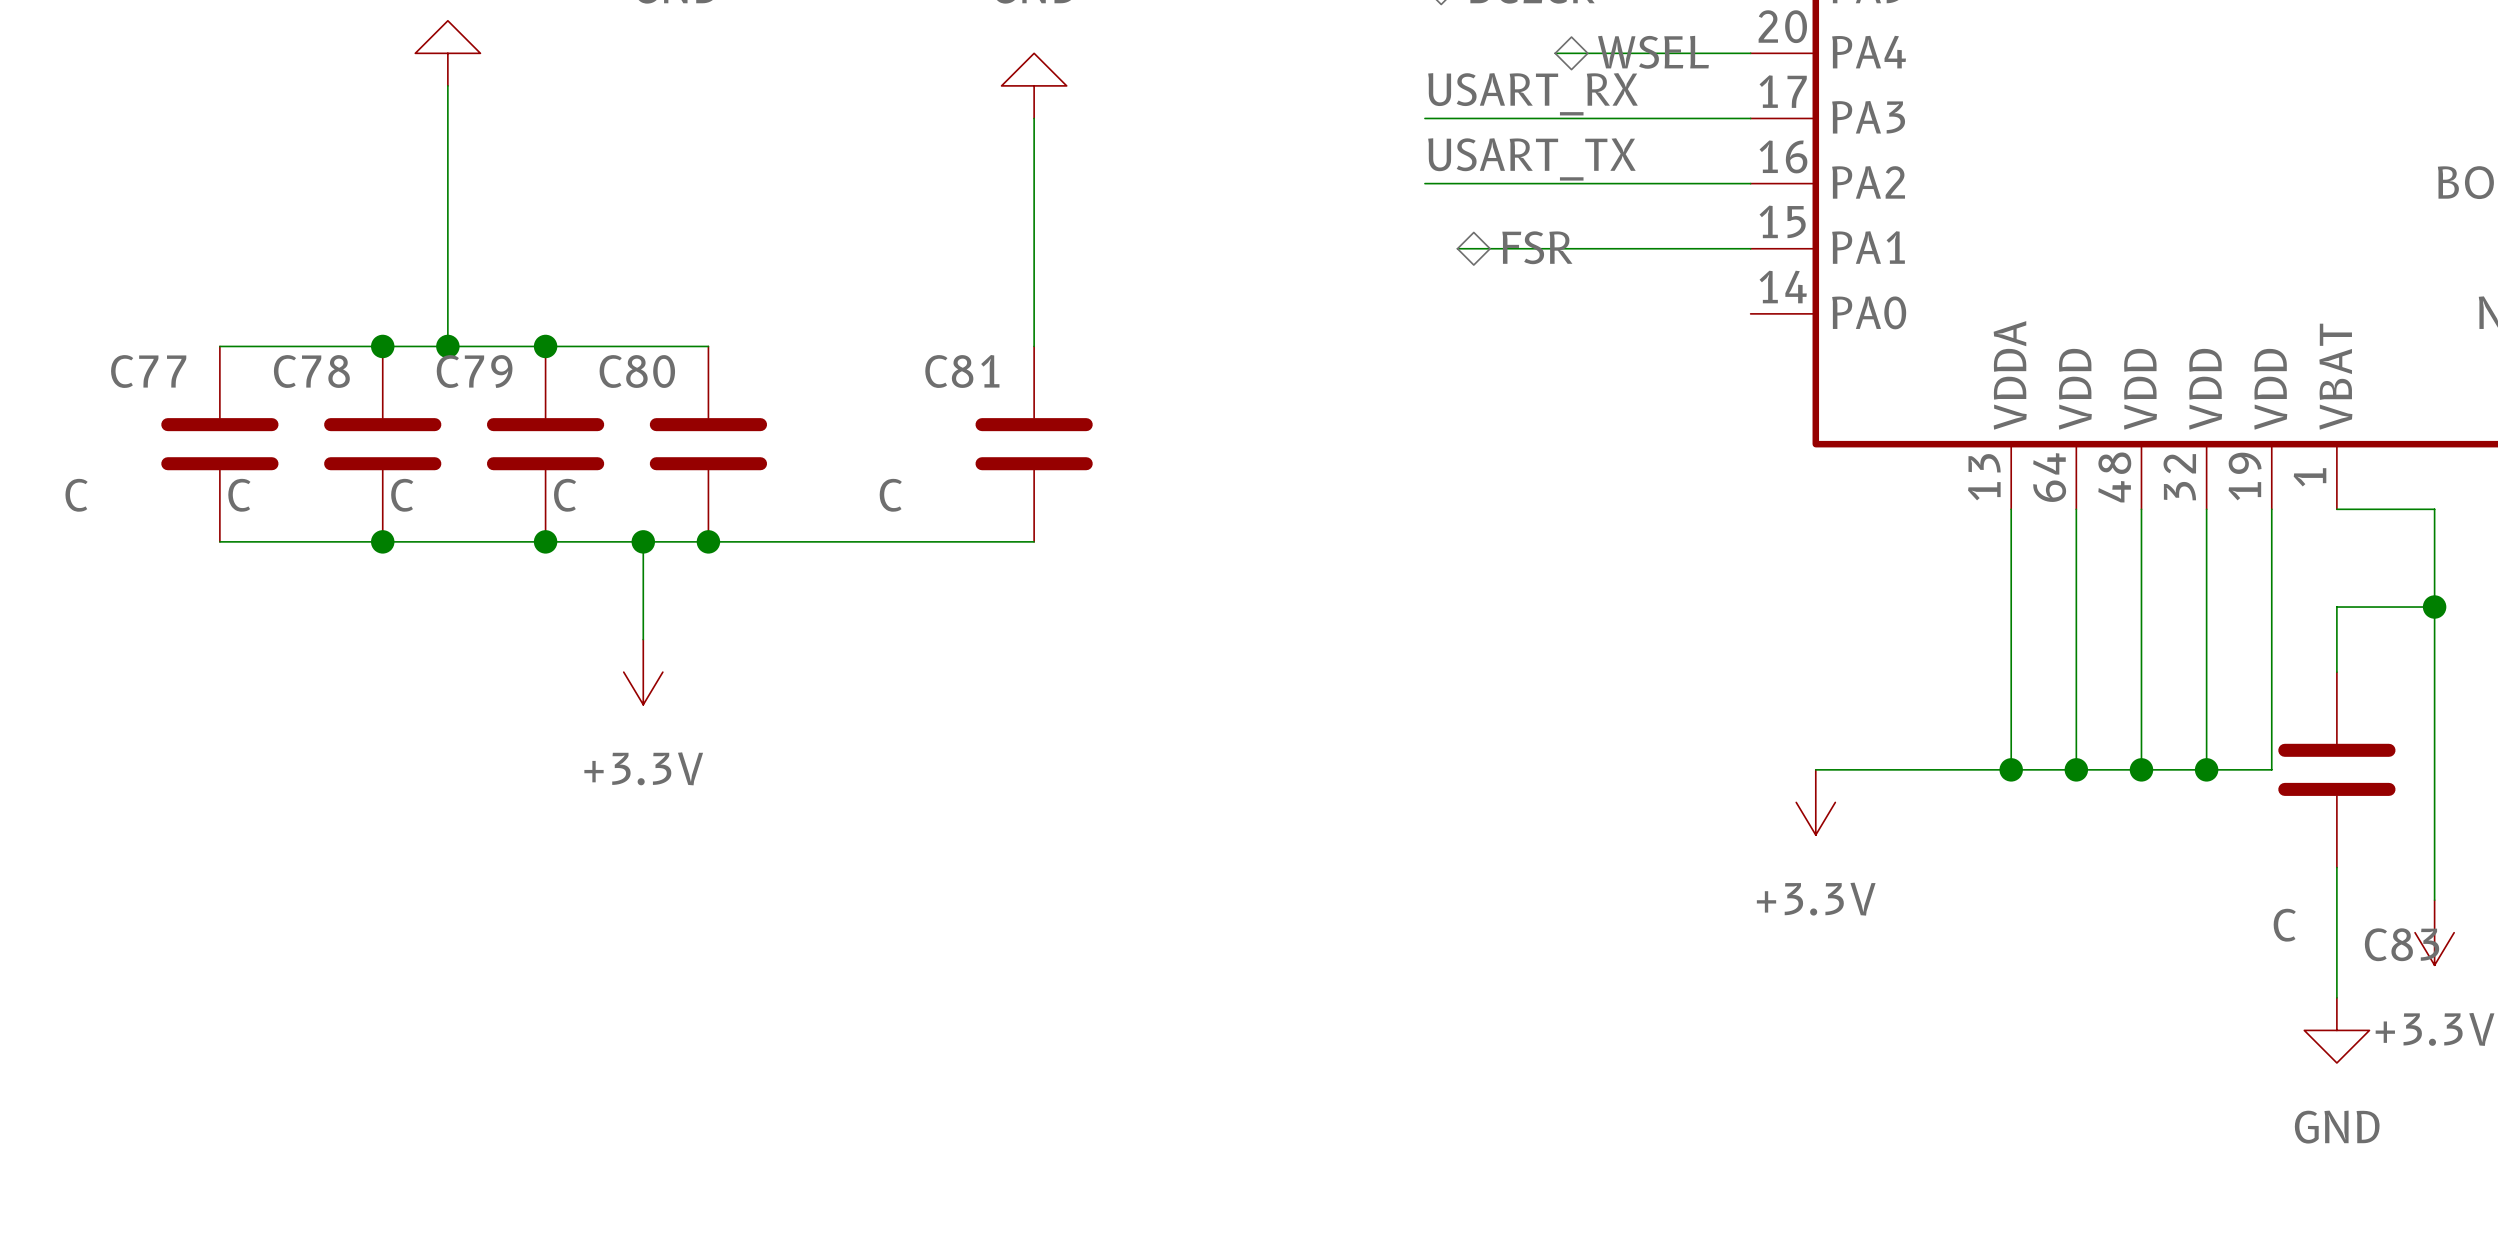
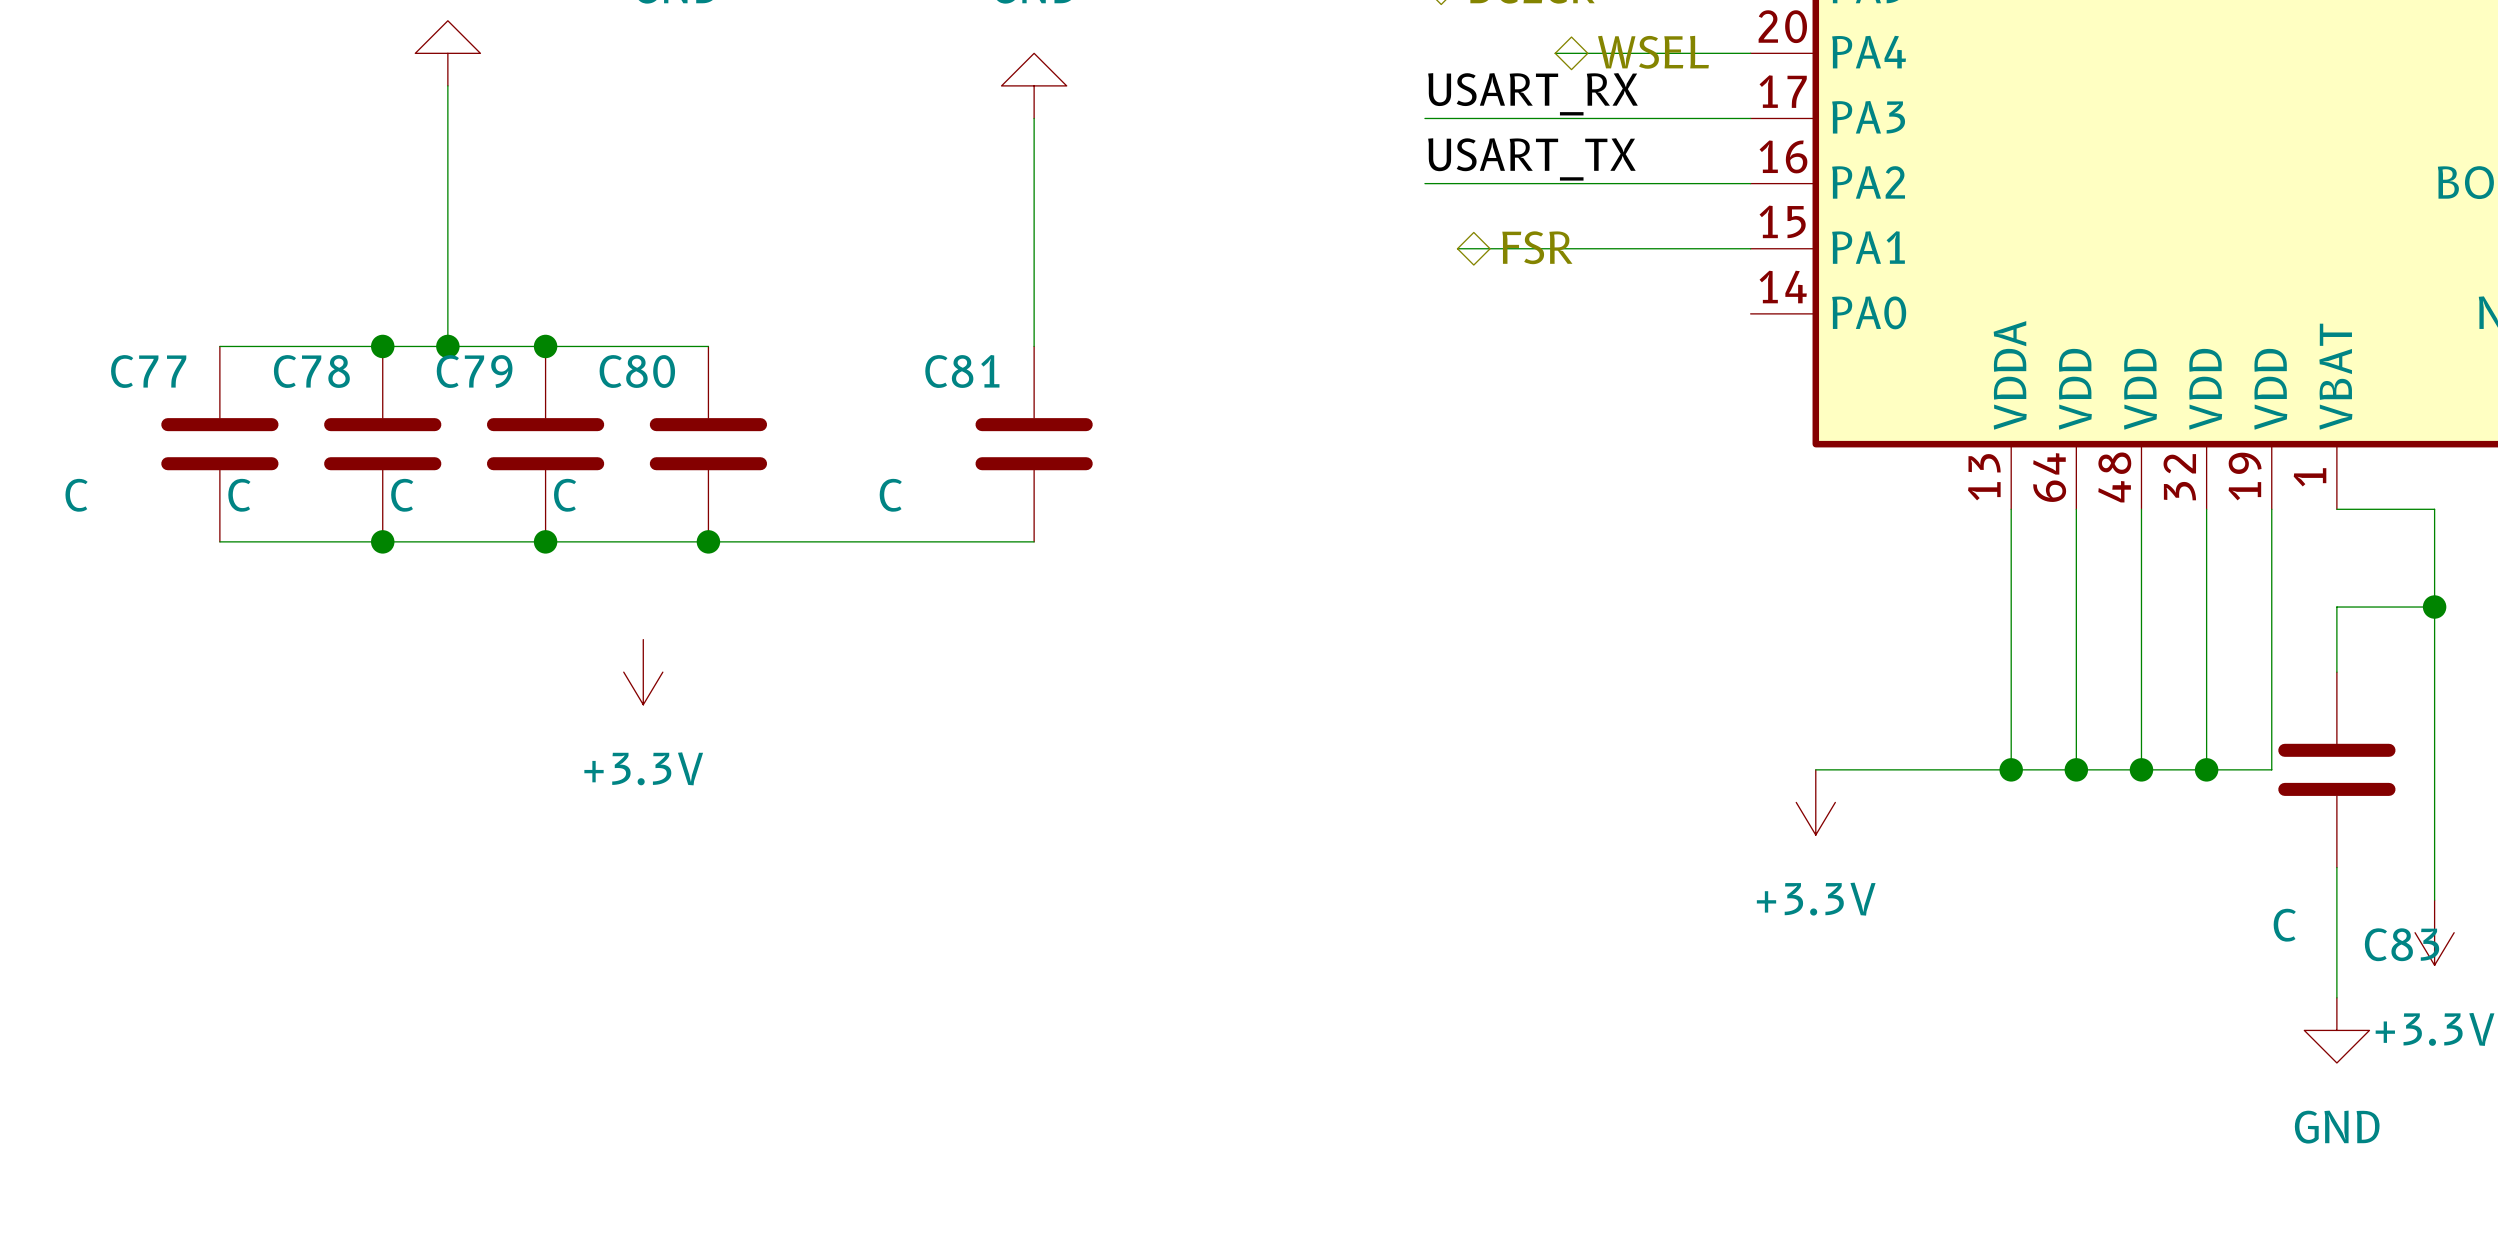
wire: (643, 541) (643, 639) -> none
junction: (643, 541) -> none

